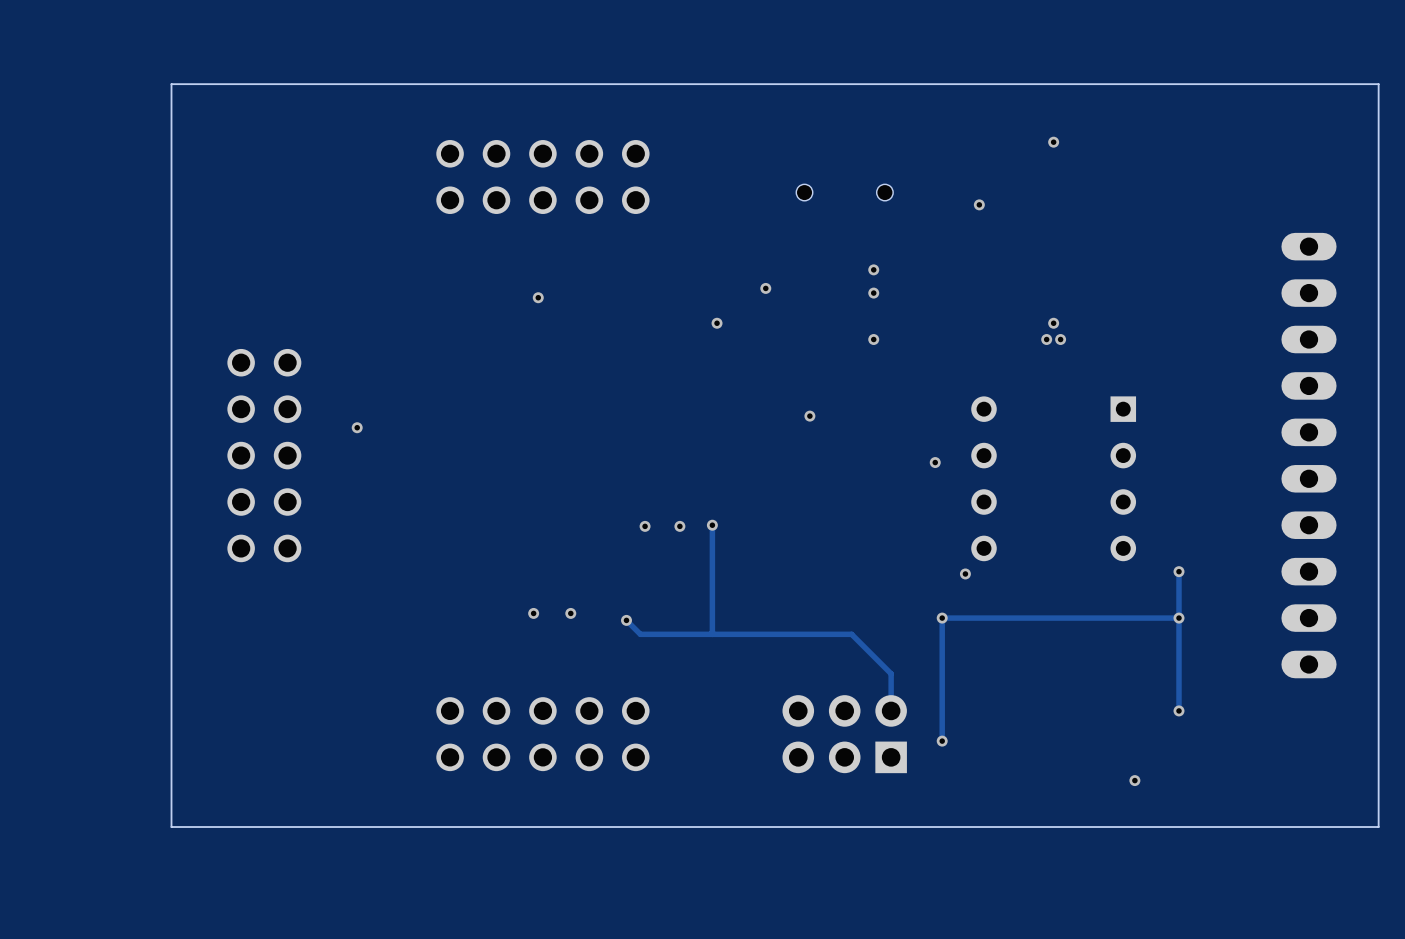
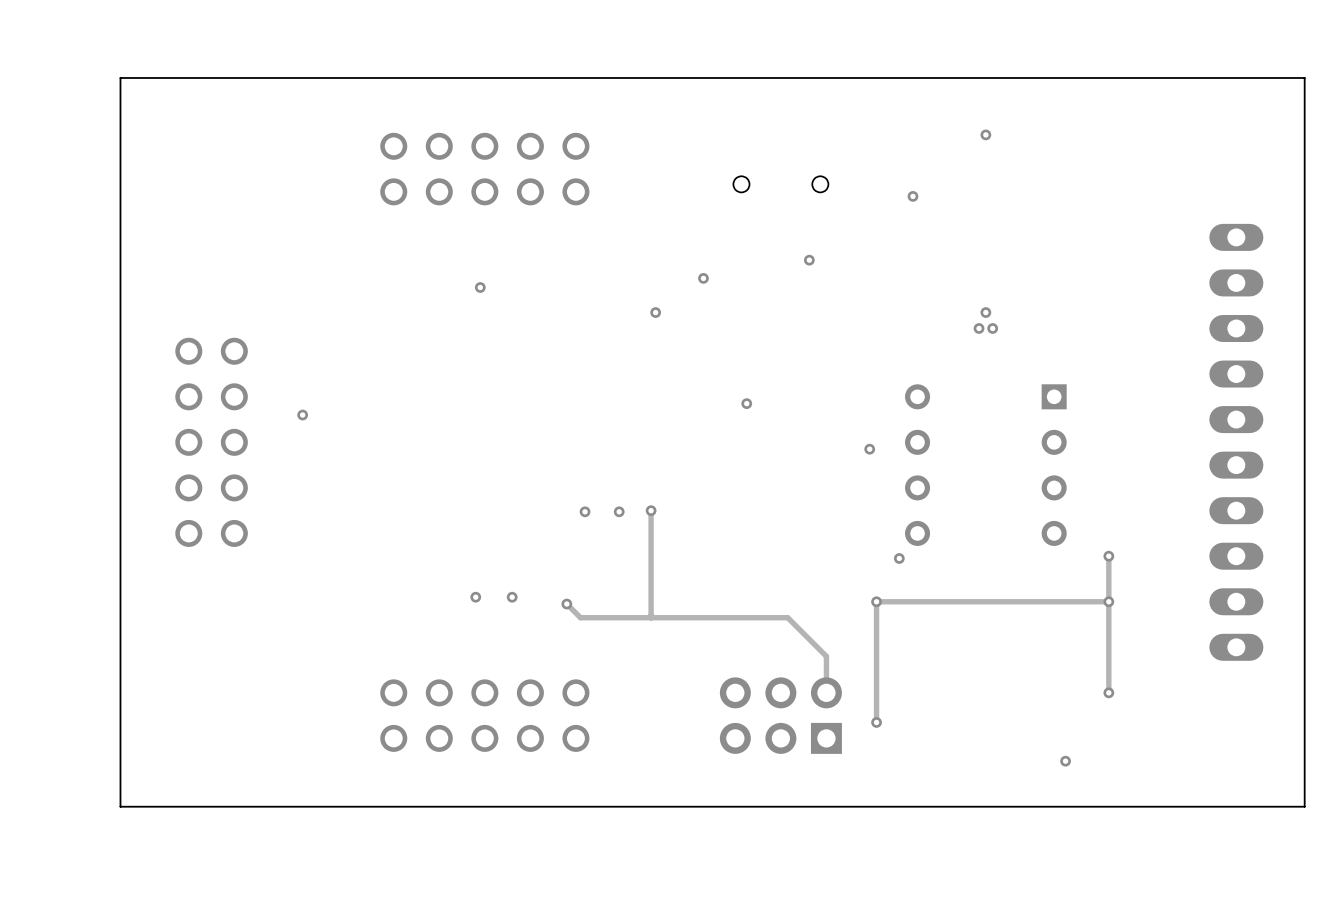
via: (873, 293) -> none
via: (873, 339) -> none

